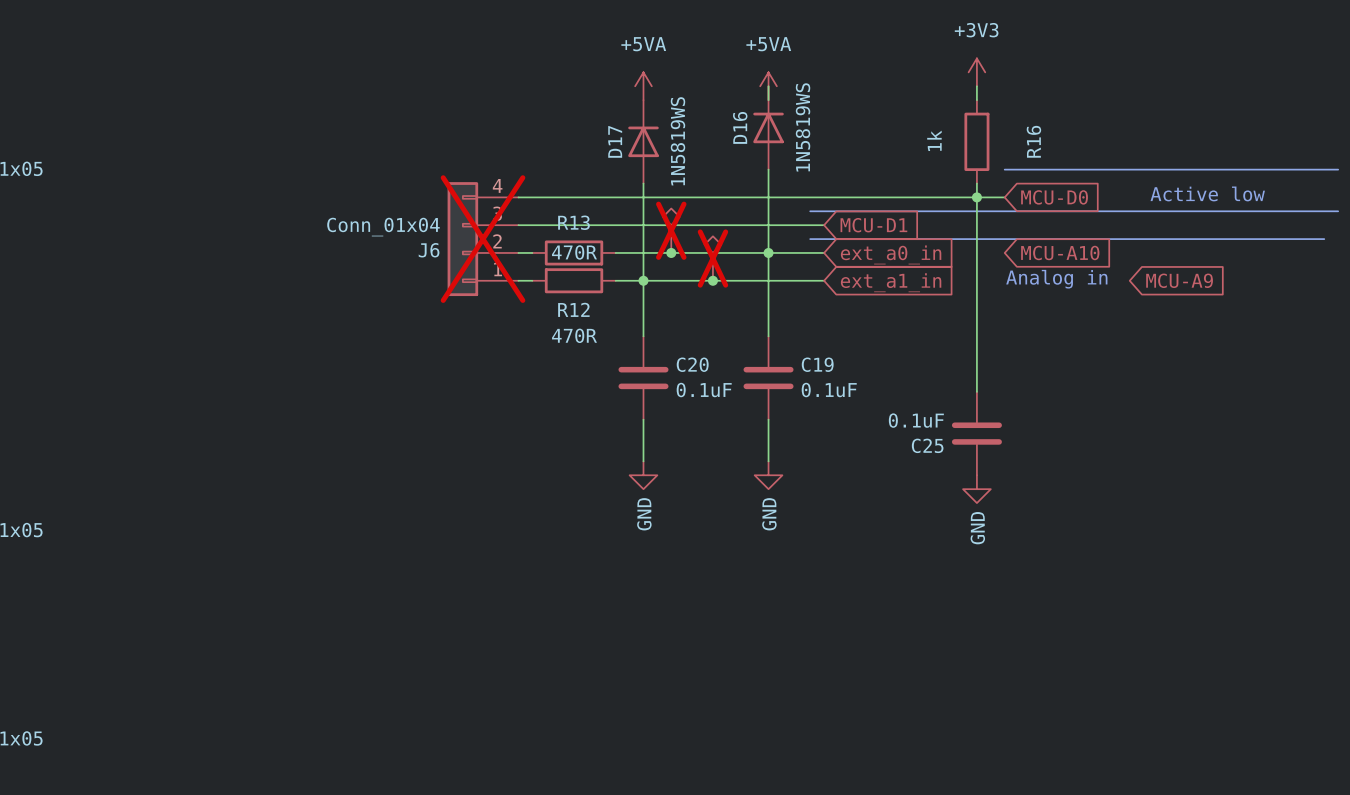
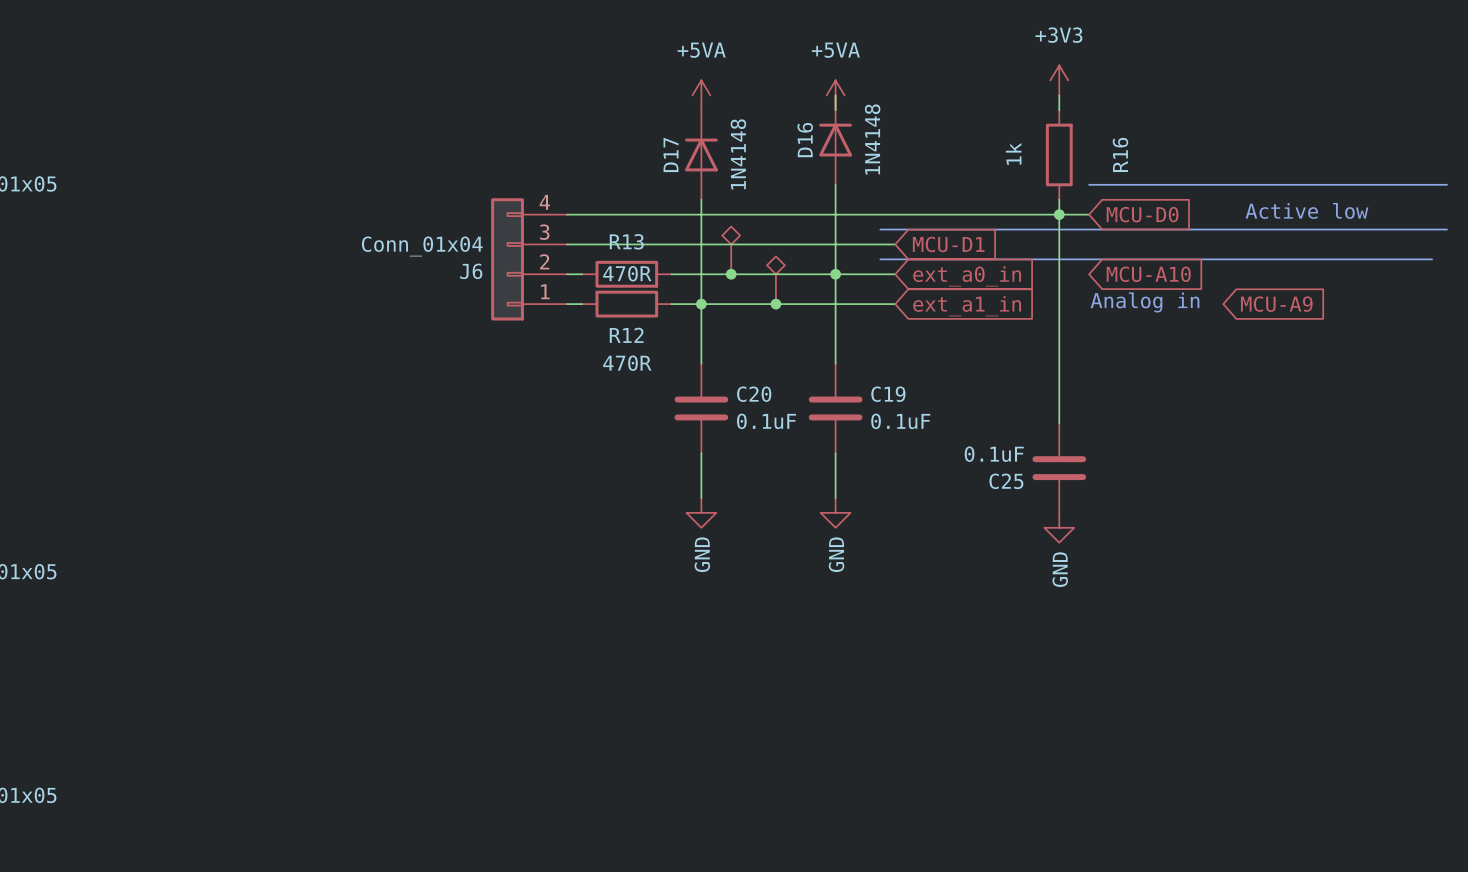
D16 value: 1N5819WS (803, 127) -> 1N4148 (872, 139)
D17 value: 1N5819WS (677, 141) -> 1N4148 (738, 154)
part do-not-place cross: (671, 230) -> none
J6 do-not-place cross: (483, 239) -> none
part do-not-place cross: (712, 258) -> none

